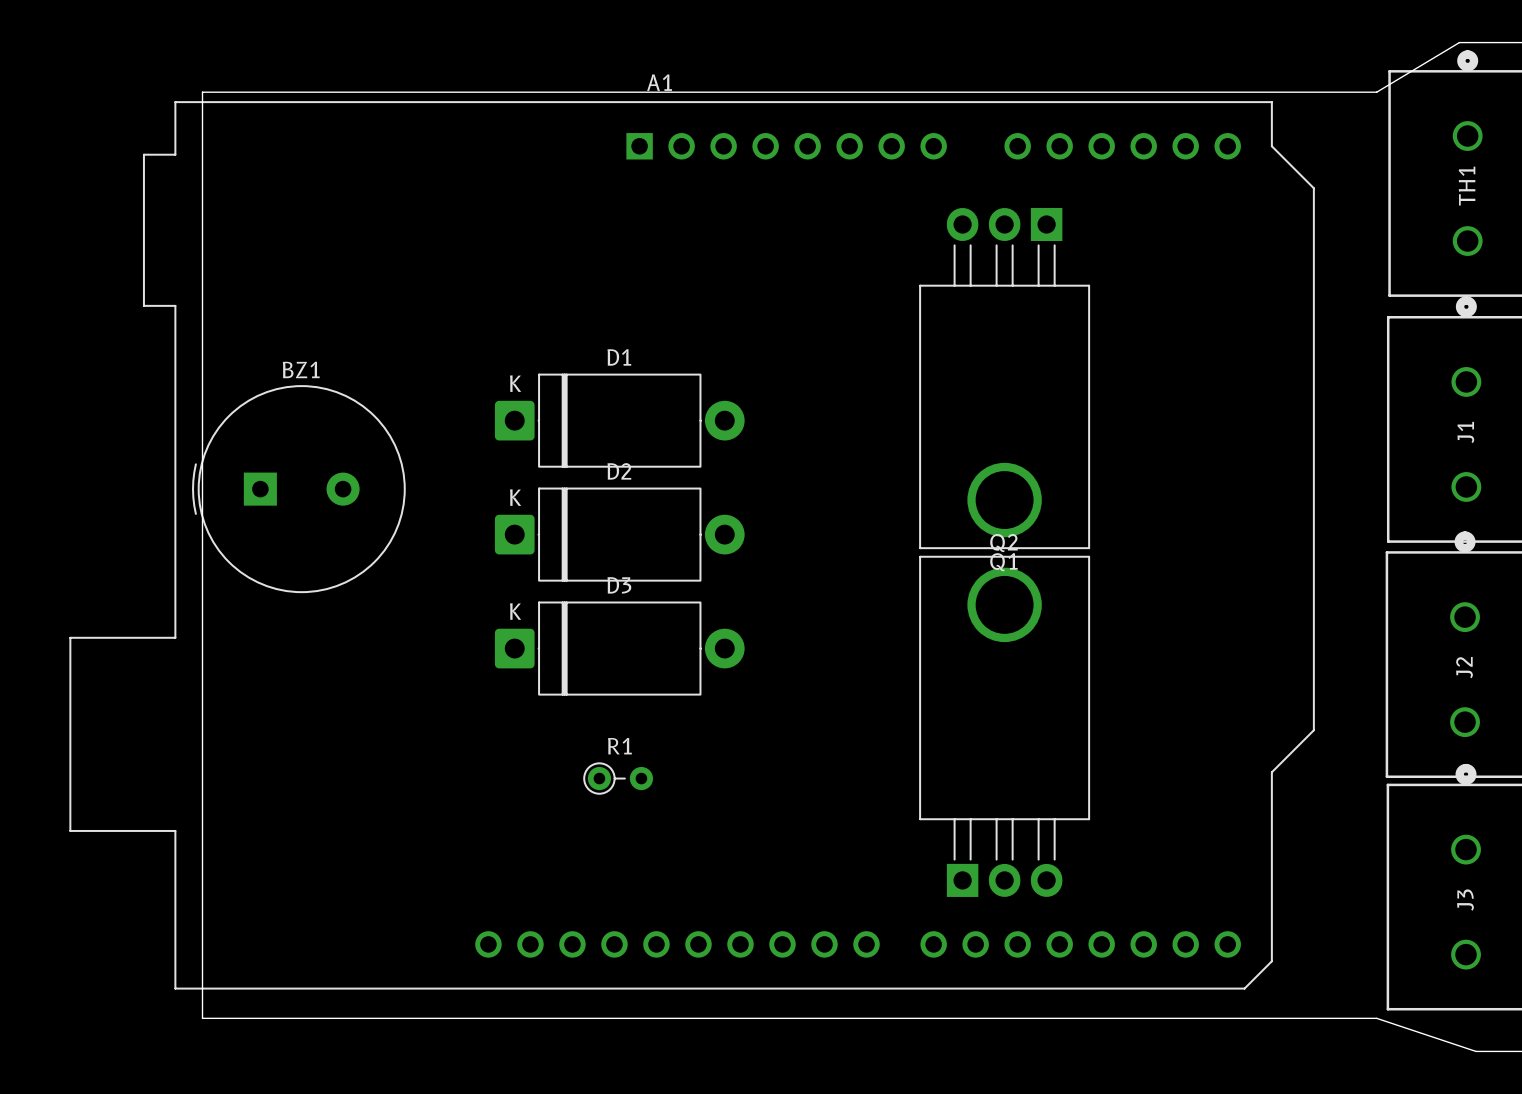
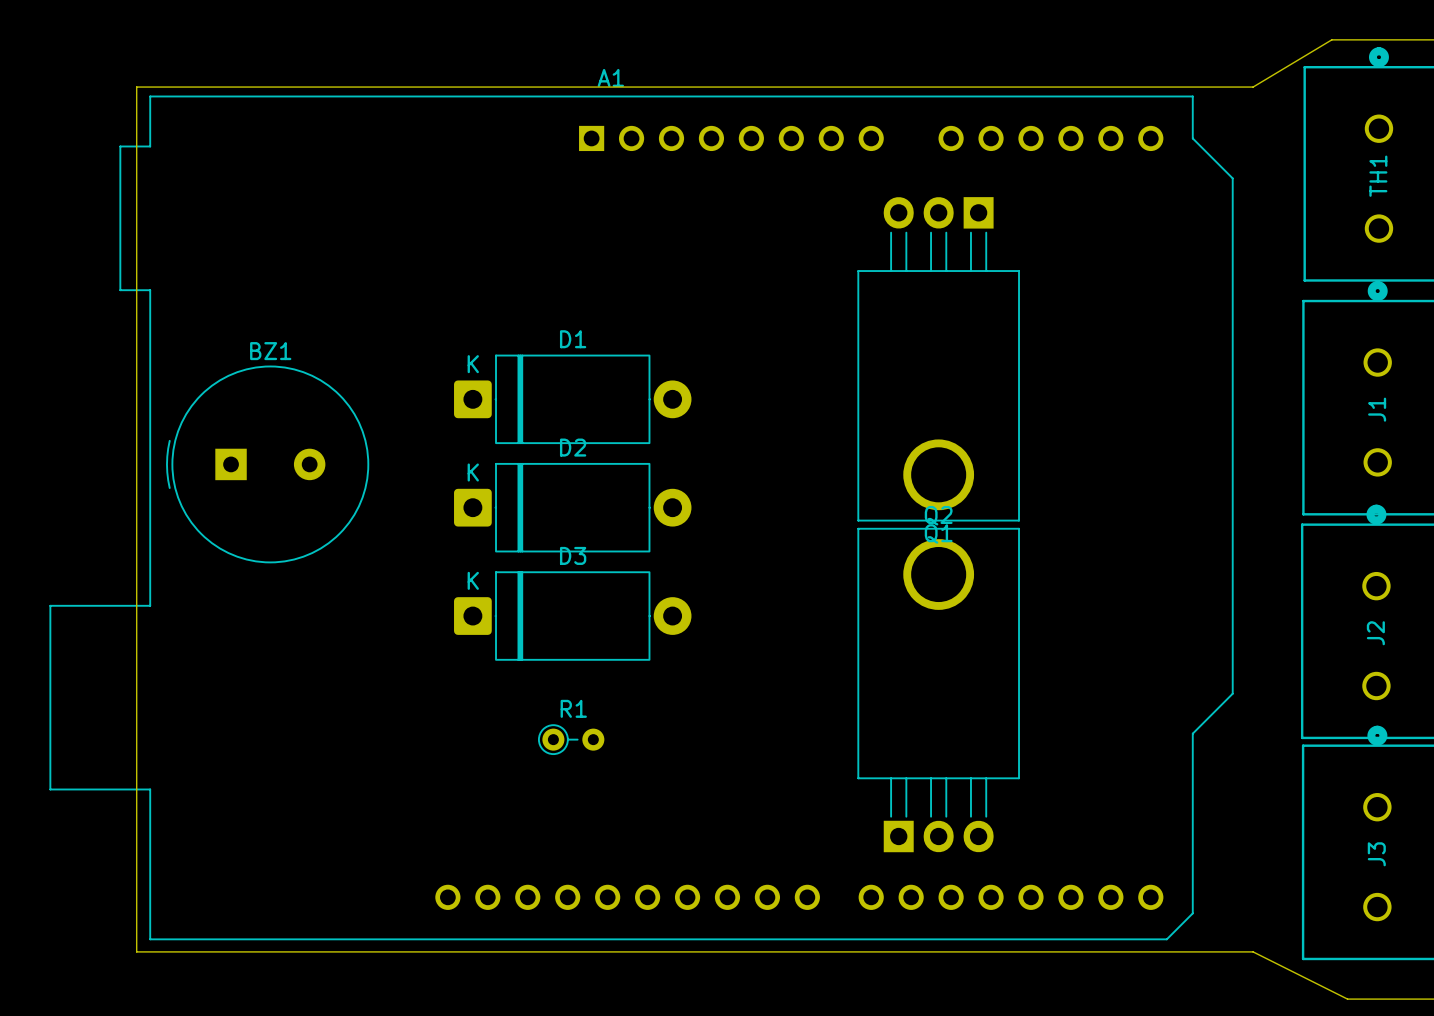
board edge: (1459, 42) (1376, 92) (1335, 92) -> (1371, 39) (1331, 39) (1253, 87)
board edge: (202, 92) (202, 1018) (1376, 1018) (1475, 1051) -> (176, 87) (136, 87) (136, 951) (1253, 951) (1347, 999) (1386, 999)

